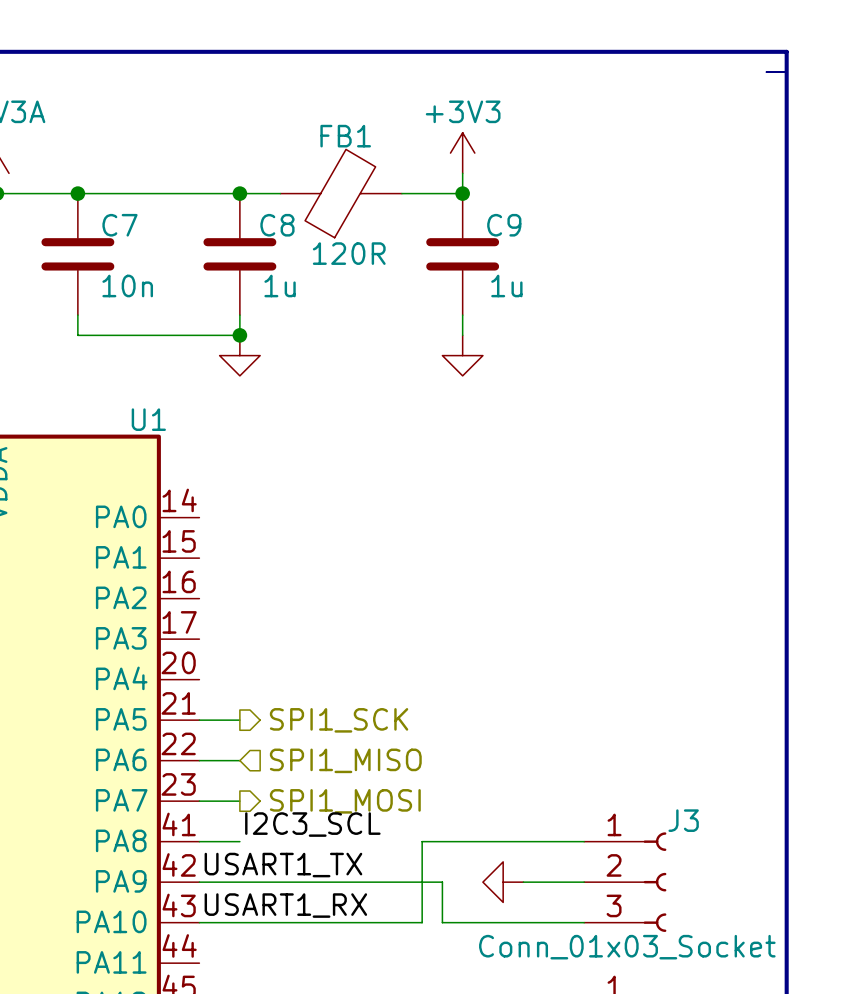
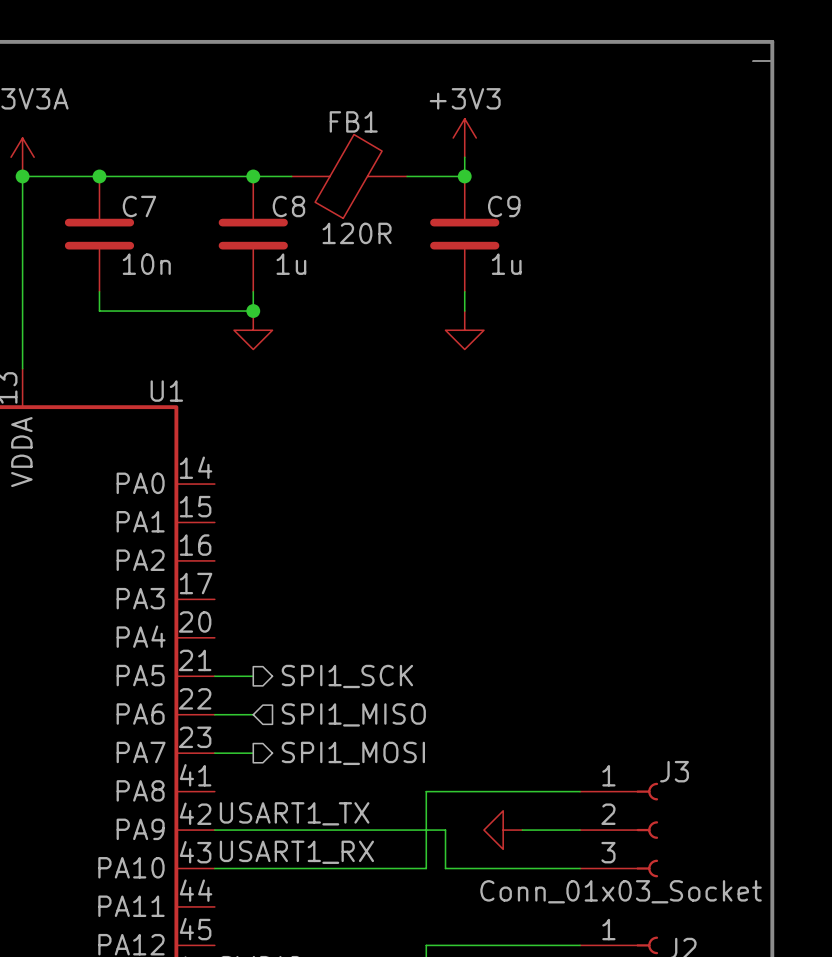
label: I2C3_SCL (312, 824) -> none
wire: (199, 841) (239, 841) -> none

